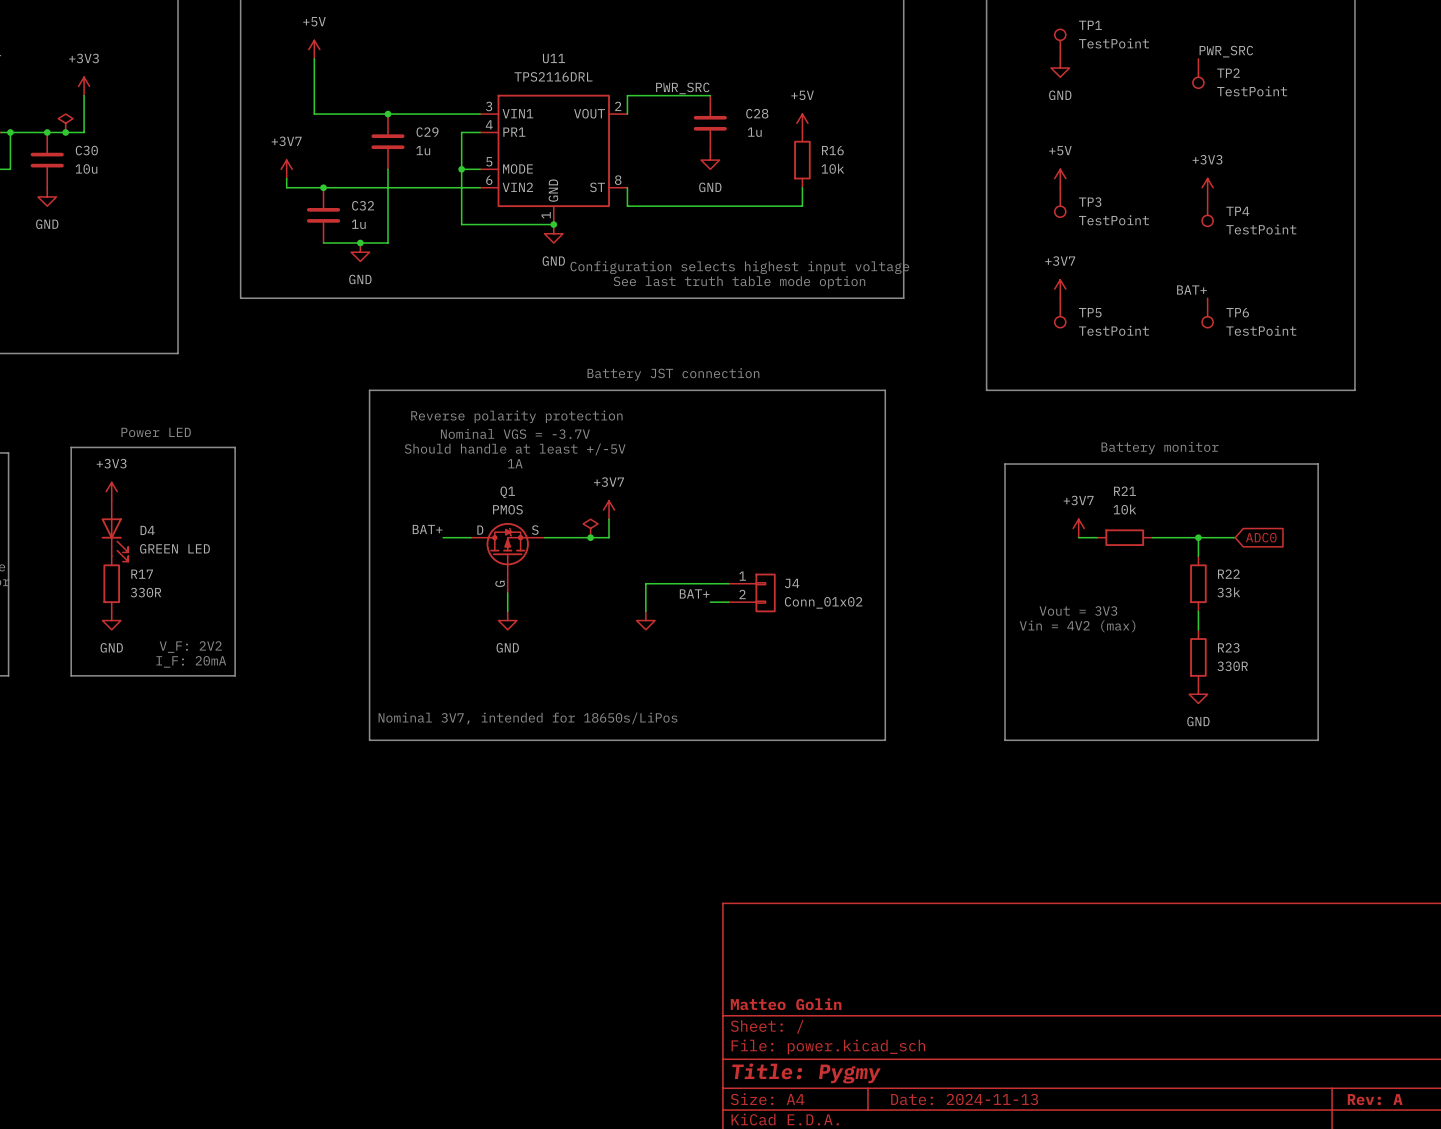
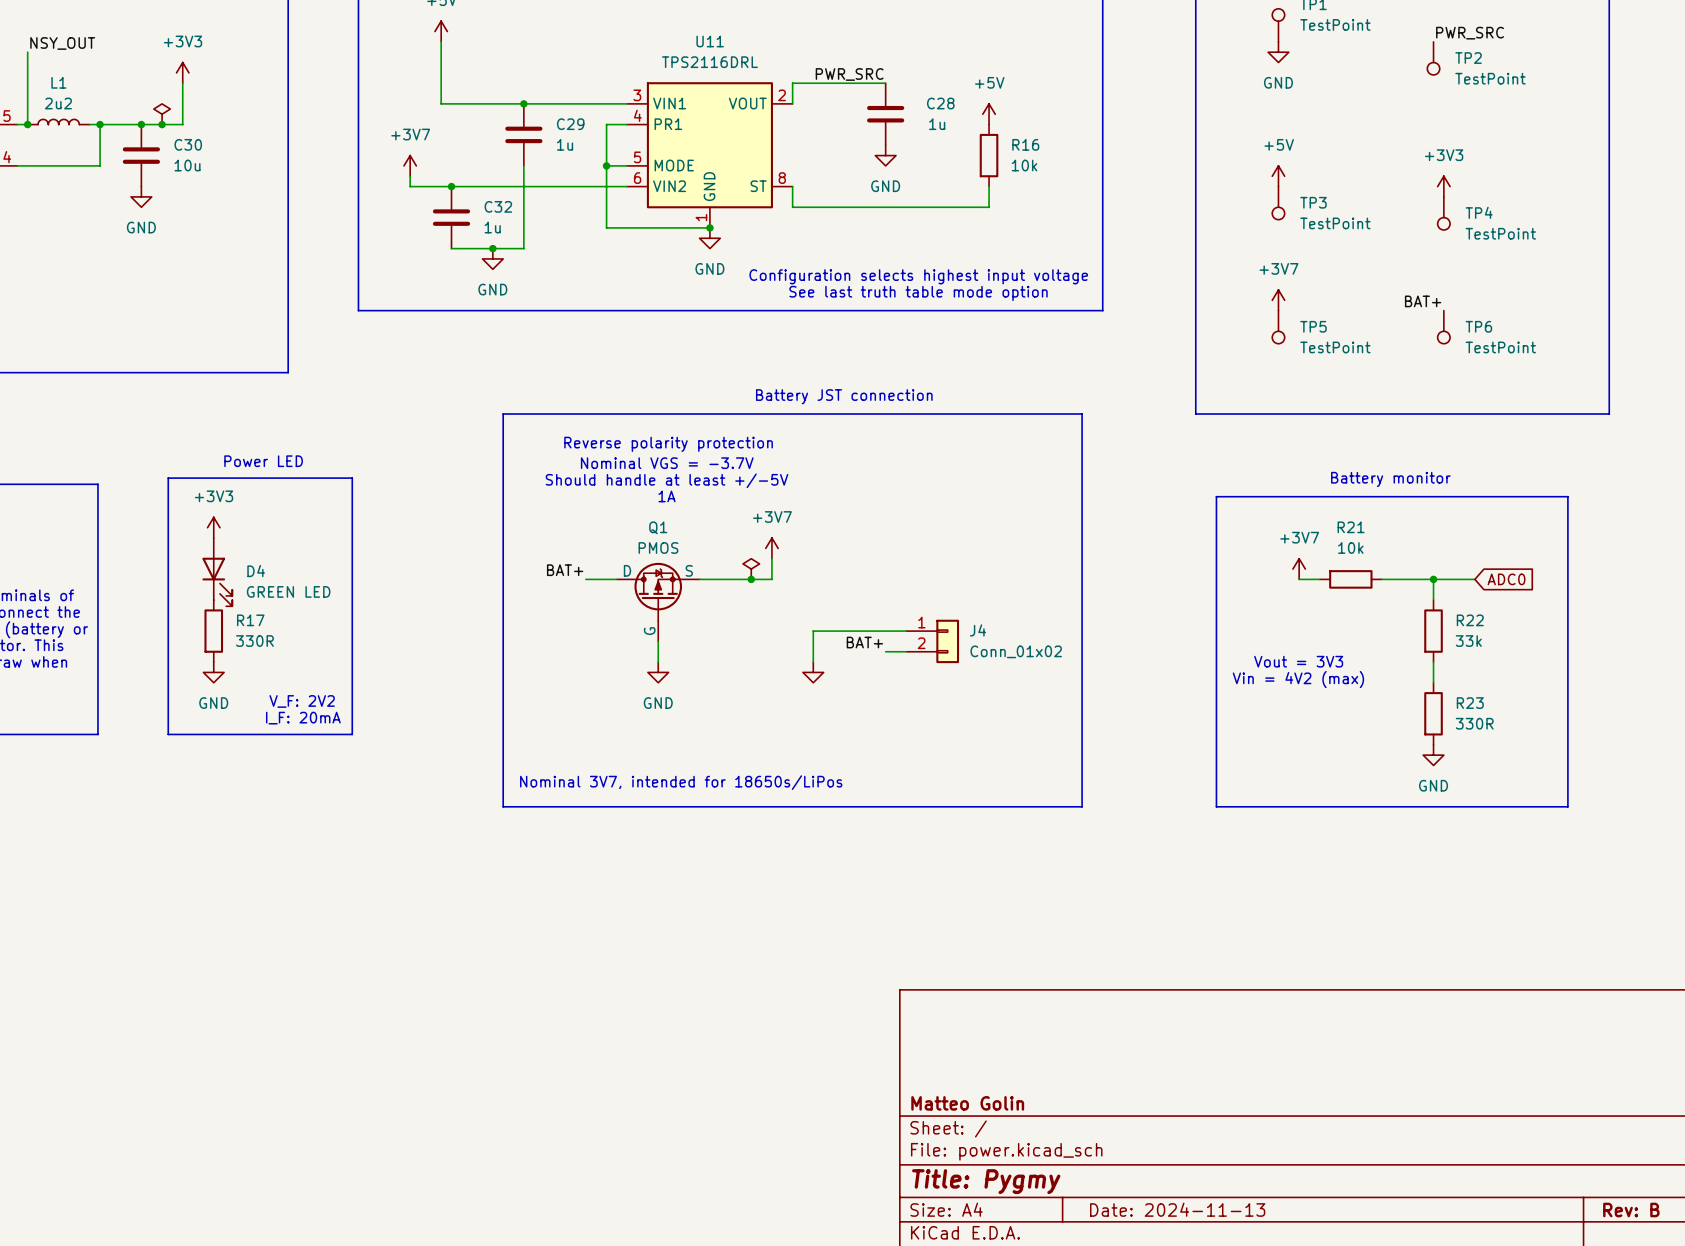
title block: Rev: A (1375, 1099) -> Rev: B (1631, 1210)

